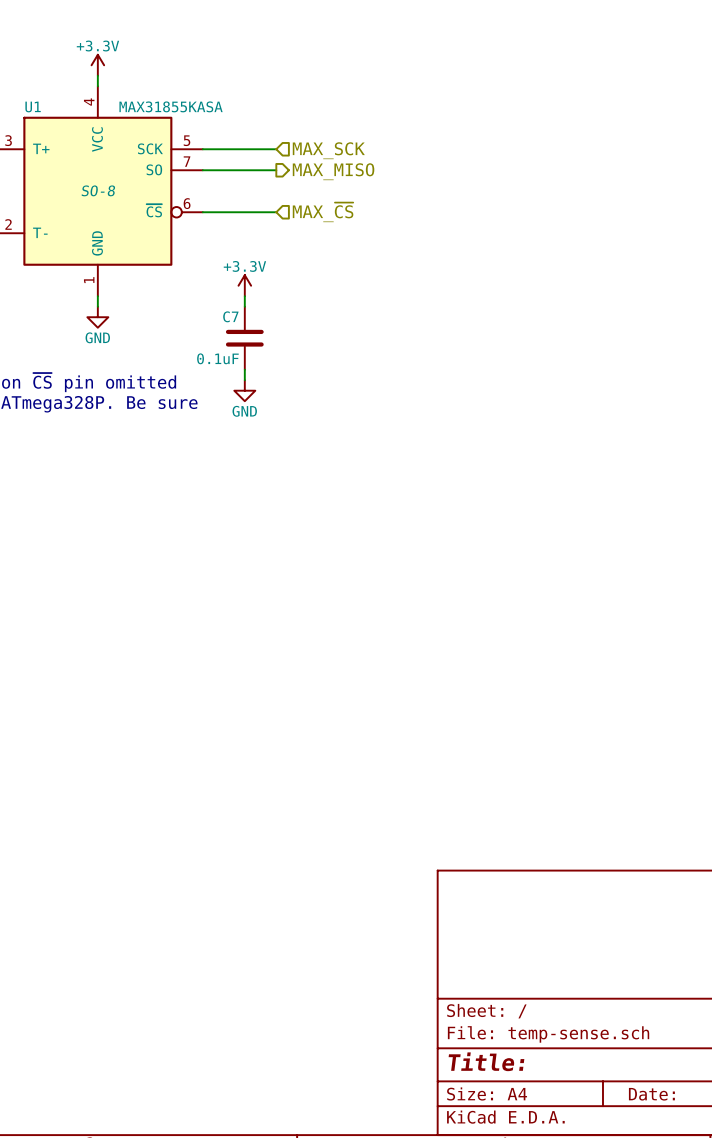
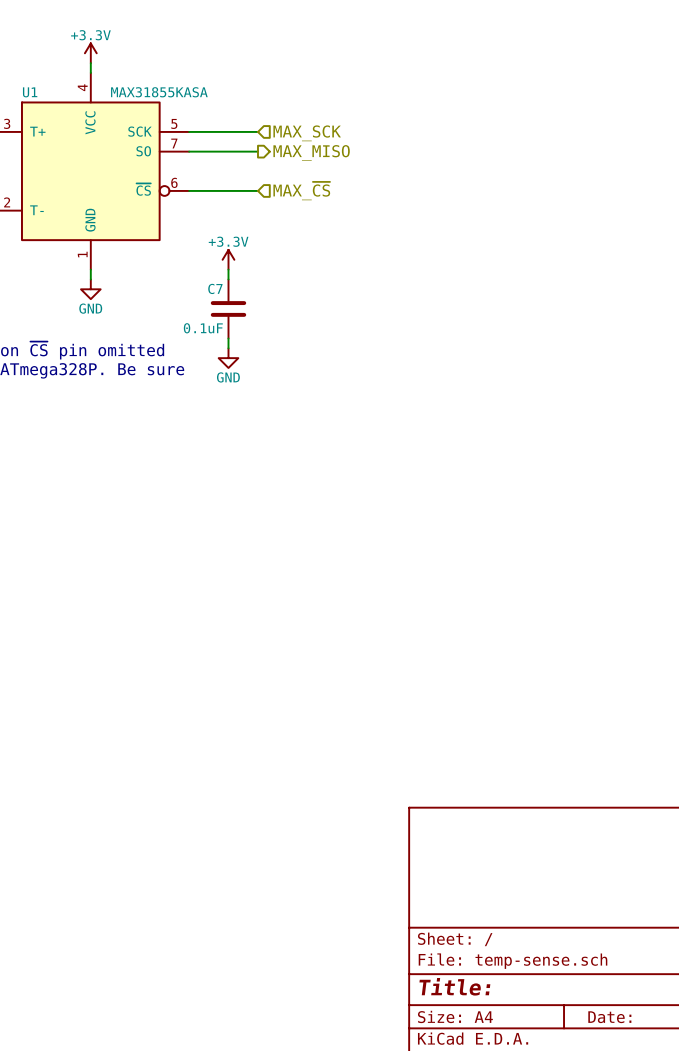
U1 text: SO-8 (98, 190) -> none

